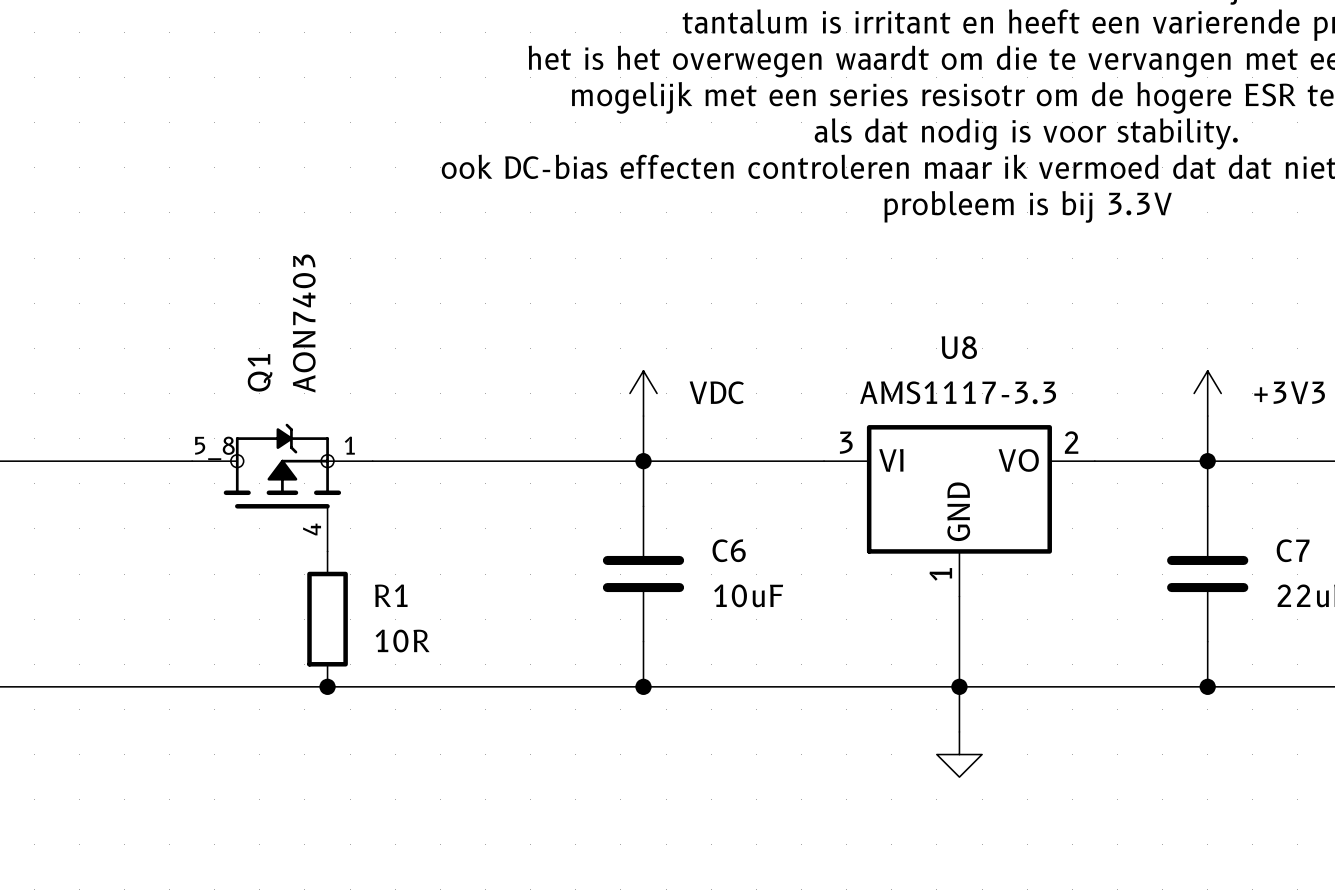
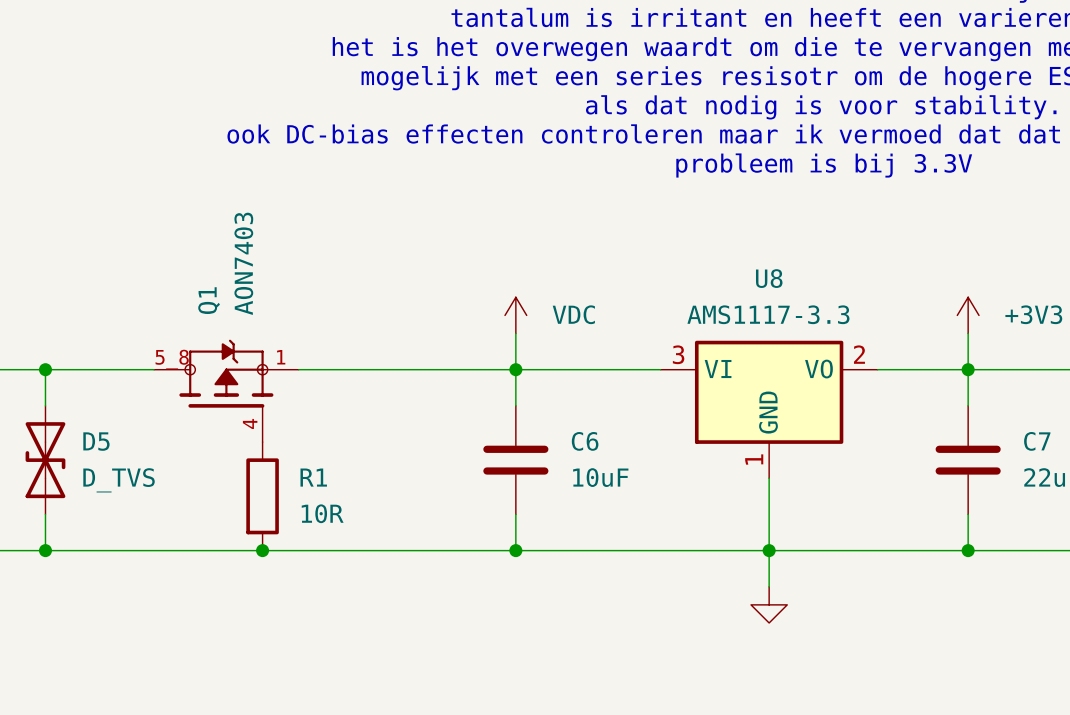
wire: none -> (45, 369) (45, 405)
junction: none -> (45, 369)
D5: none -> D_TVS (45, 460)
wire: none -> (45, 514) (45, 550)
junction: none -> (45, 550)

